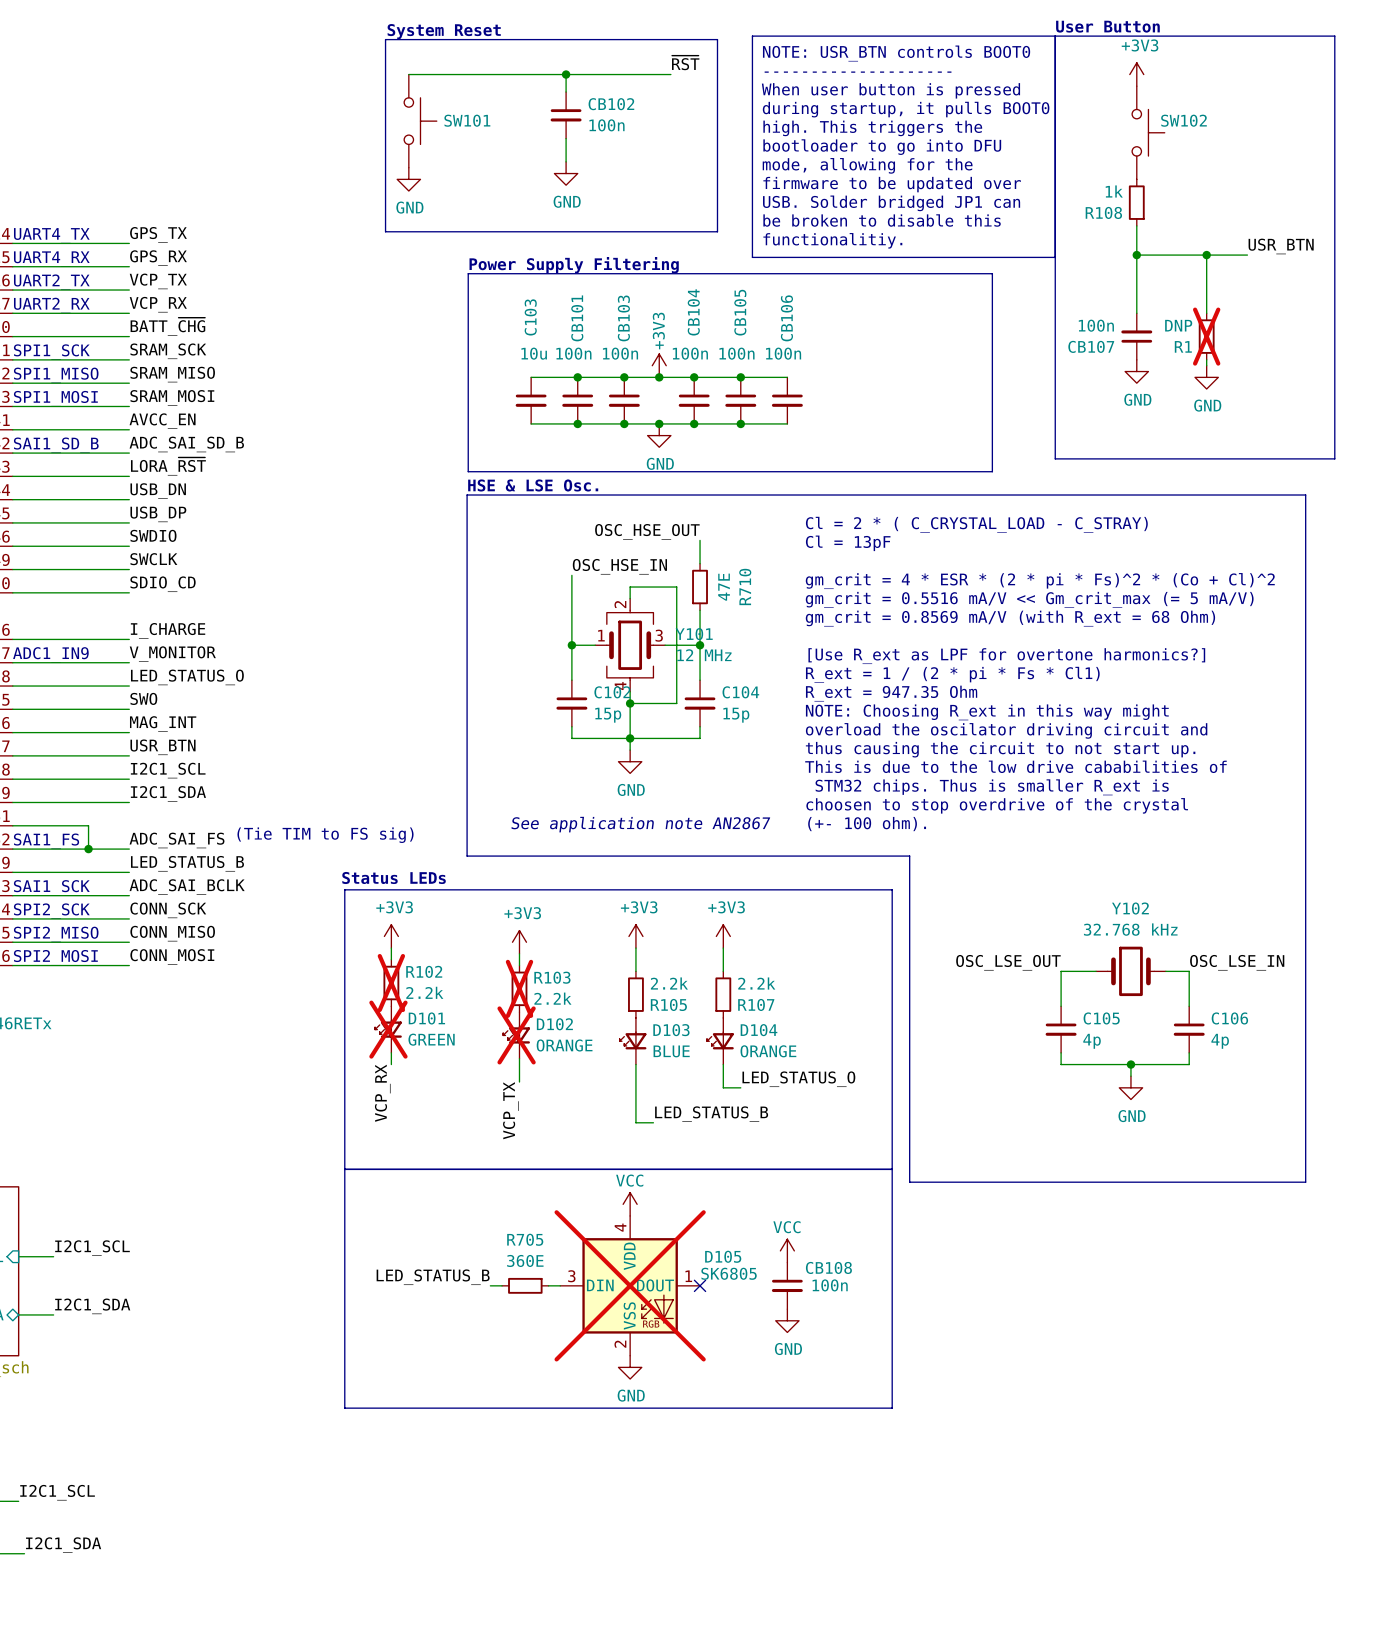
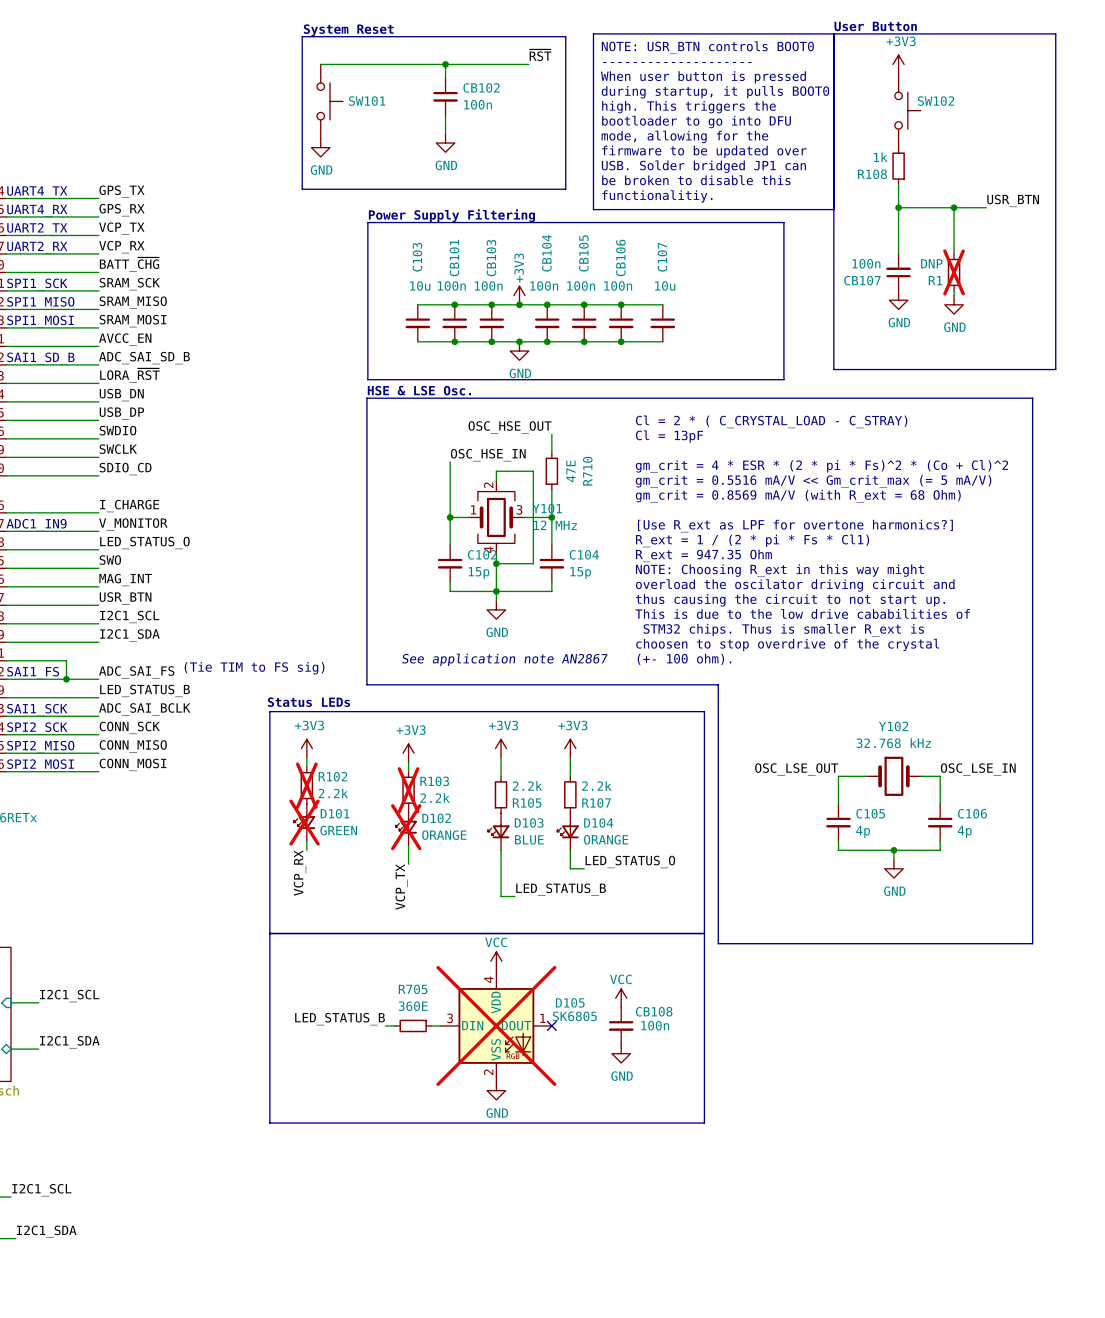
wire: none -> (621, 304) (662, 304)
junction: none -> (621, 304)
C107: none -> 10u (662, 323)
wire: none -> (621, 341) (662, 341)
junction: none -> (621, 341)

